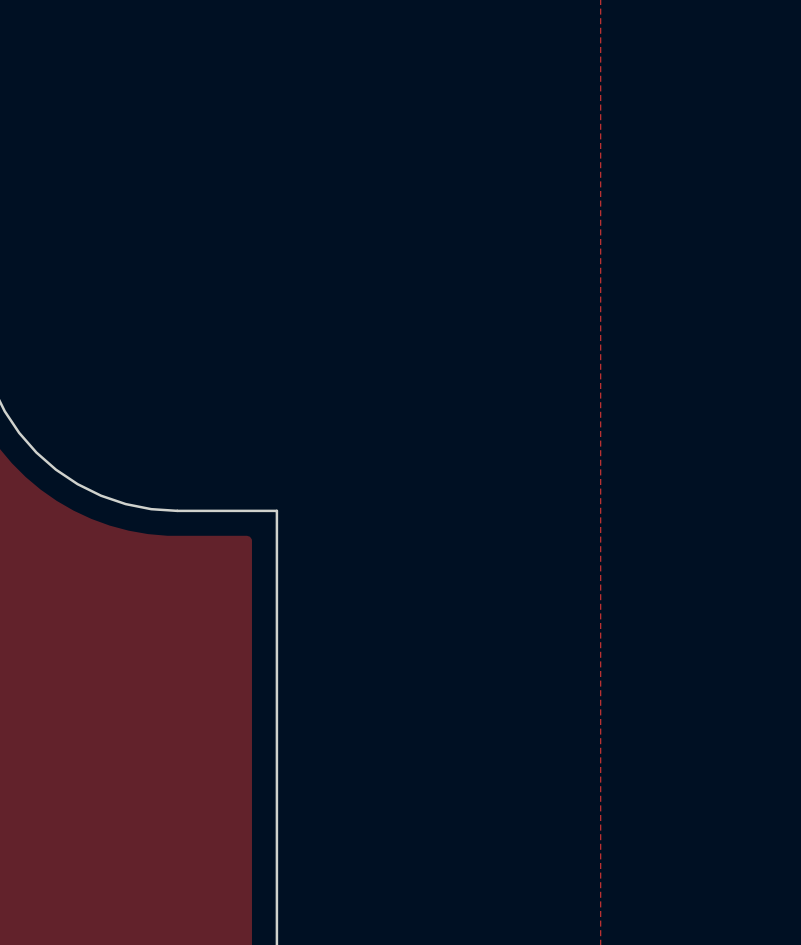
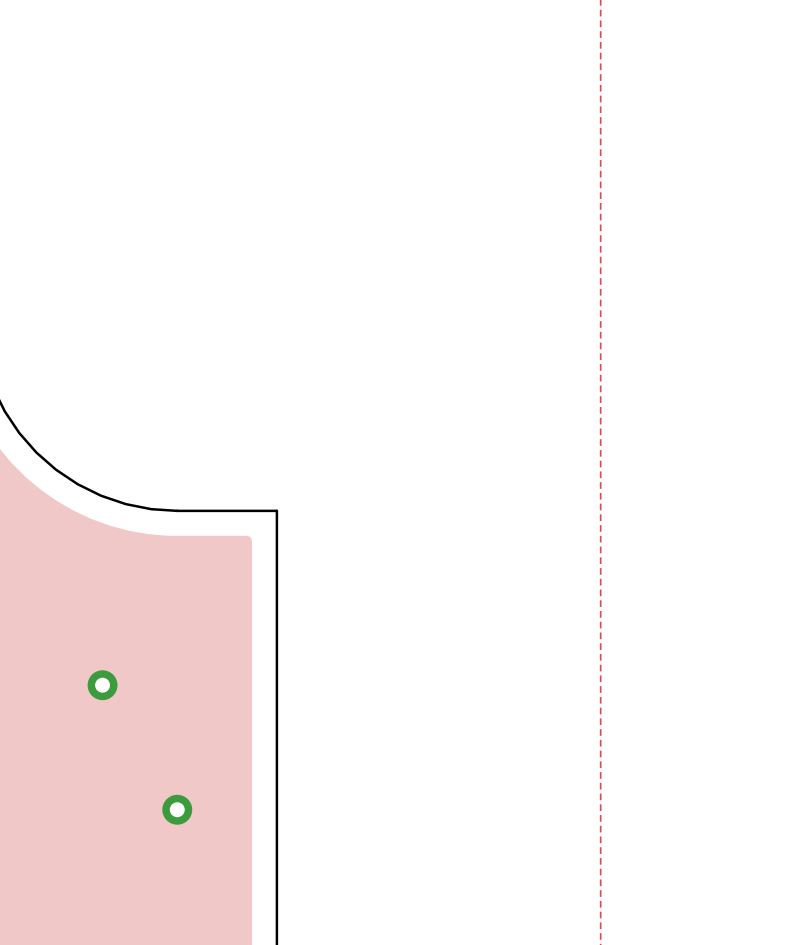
via: none -> (102, 685)
via: none -> (177, 809)

